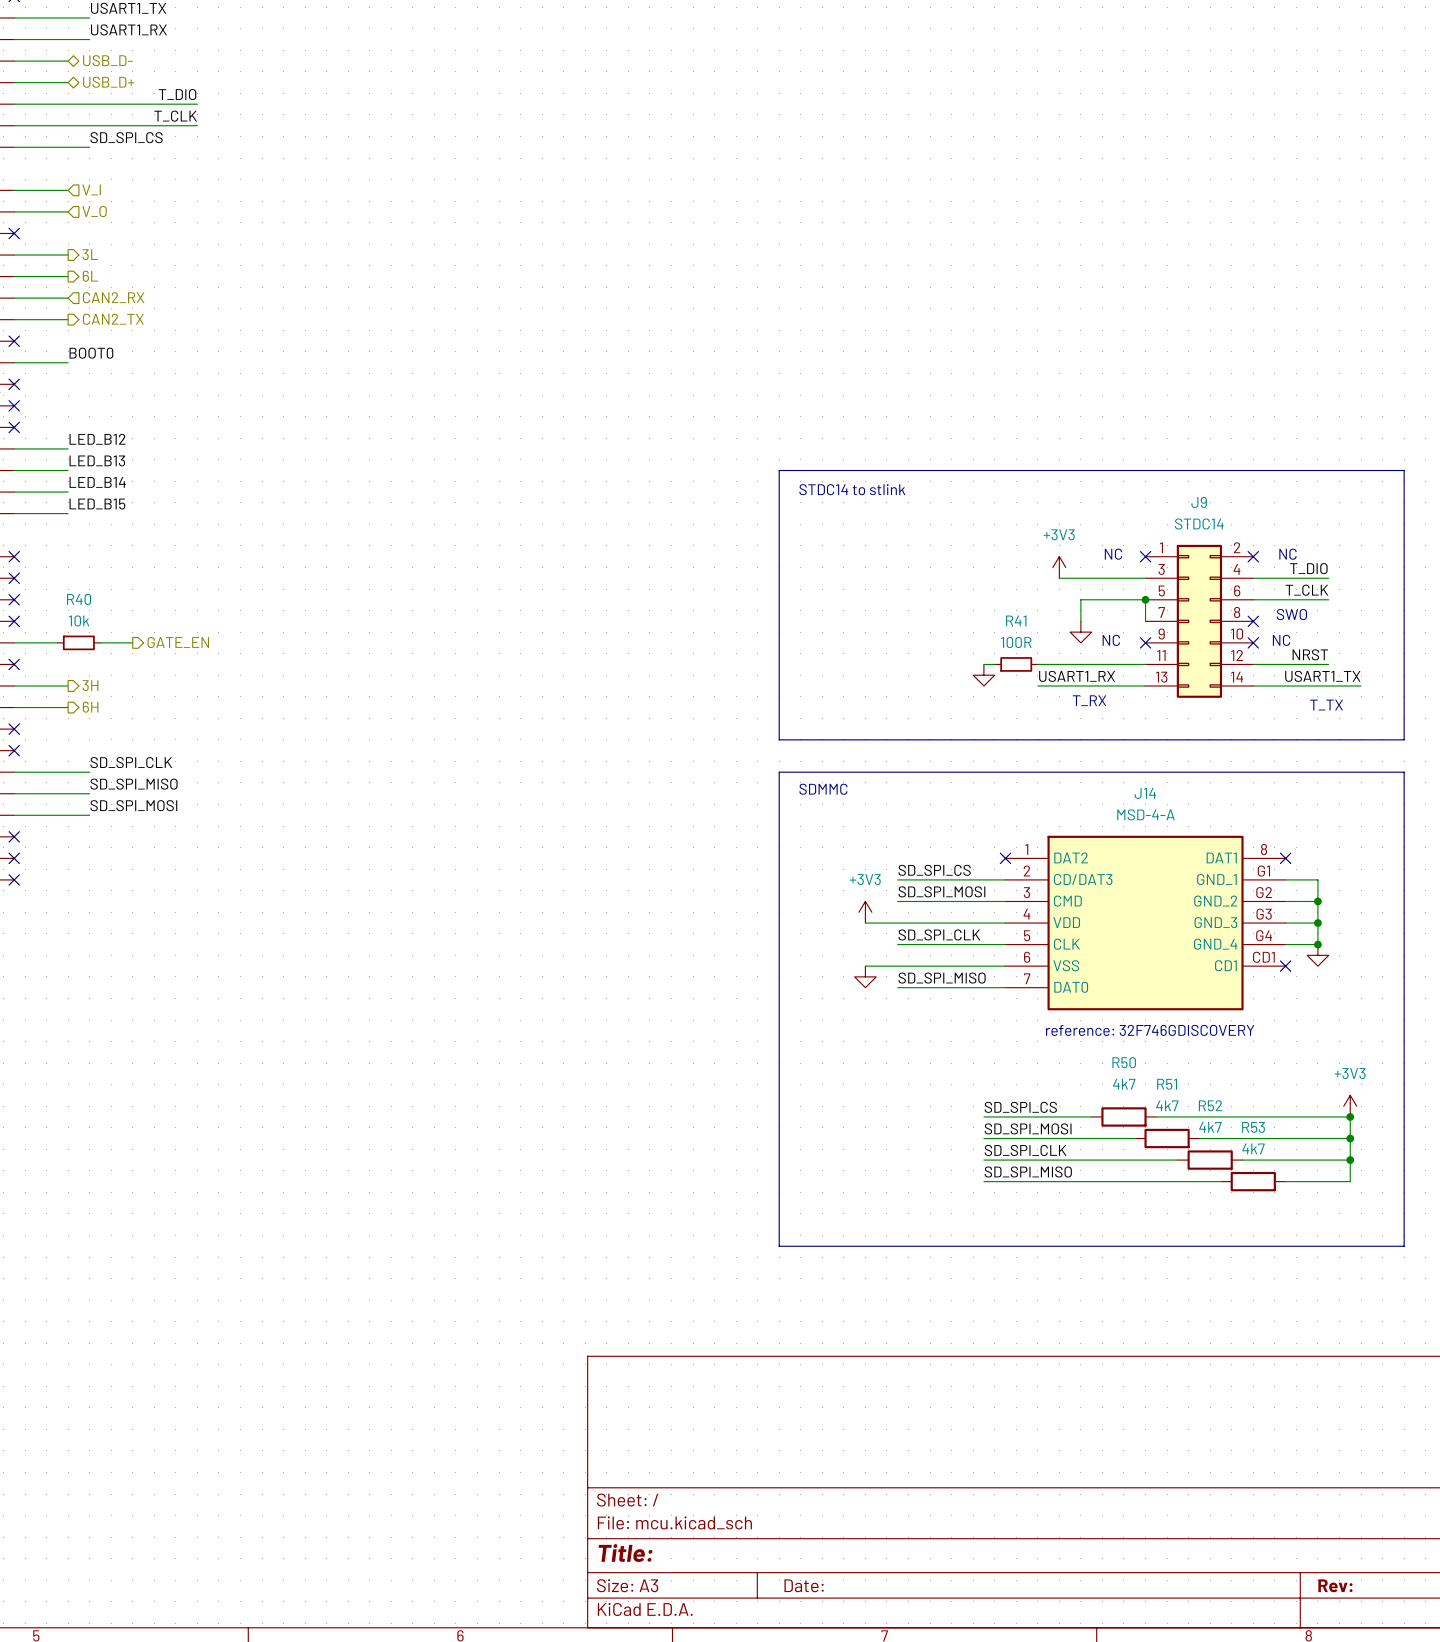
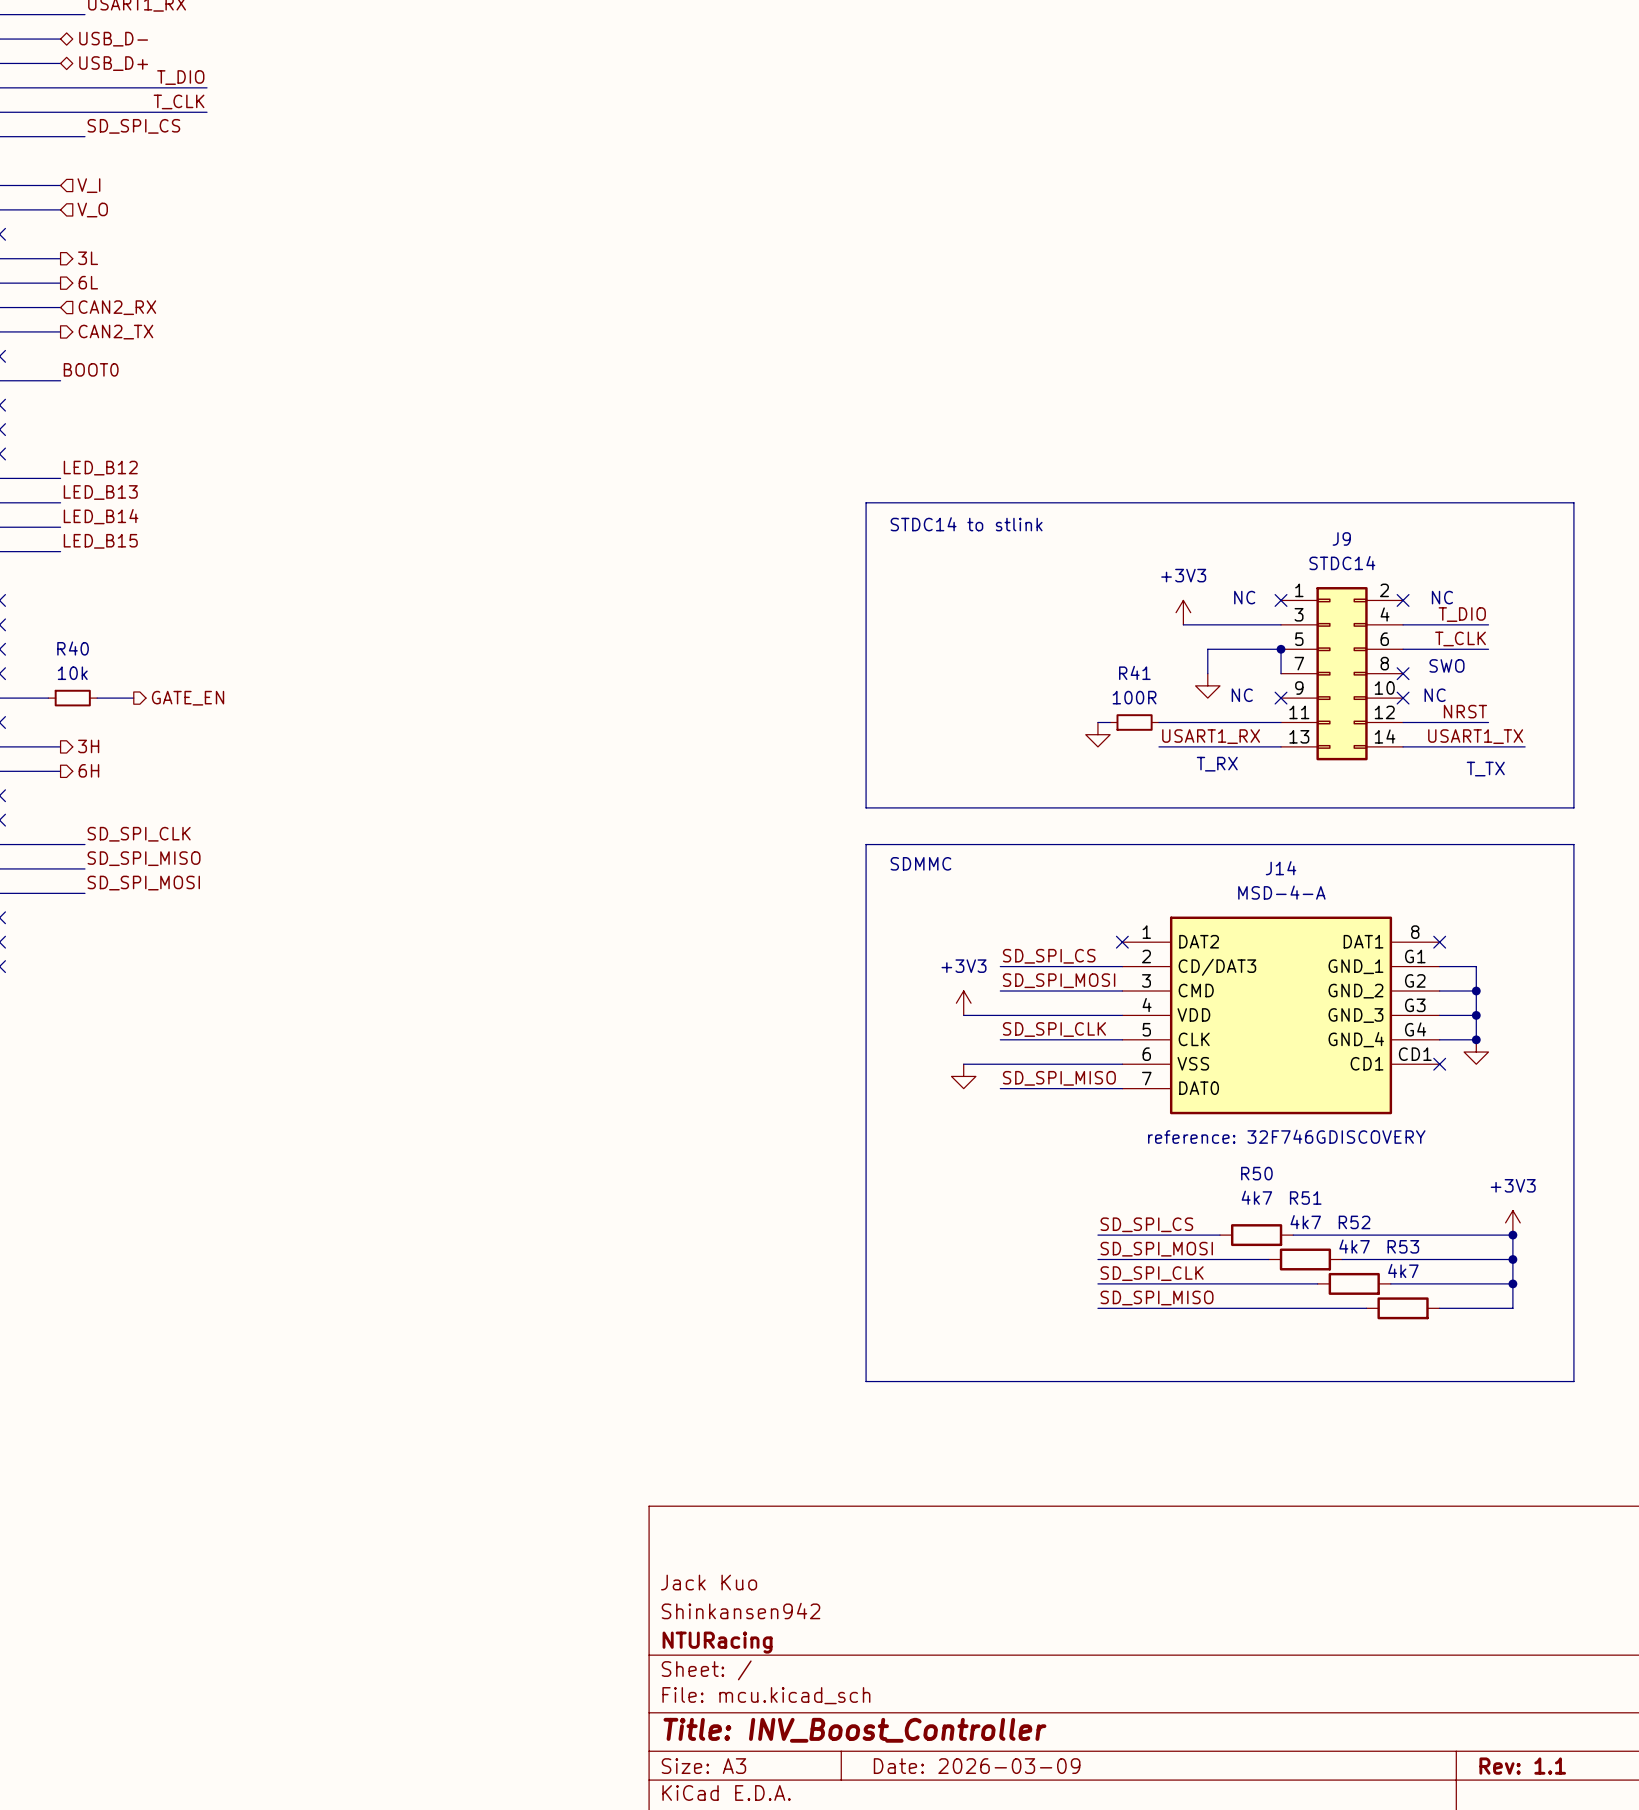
title block: none -> Jack Kuo (709, 1582)
title block: none -> Shinkansen942 (740, 1611)
title block: none -> NTURacing (717, 1642)
title block: Title: (625, 1553) -> Title: INV_Boost_Controller (854, 1730)
title block: Date: (804, 1585) -> Date: 2026-03-09 (977, 1766)
title block: Rev: (1335, 1585) -> Rev: 1.1 (1522, 1766)

